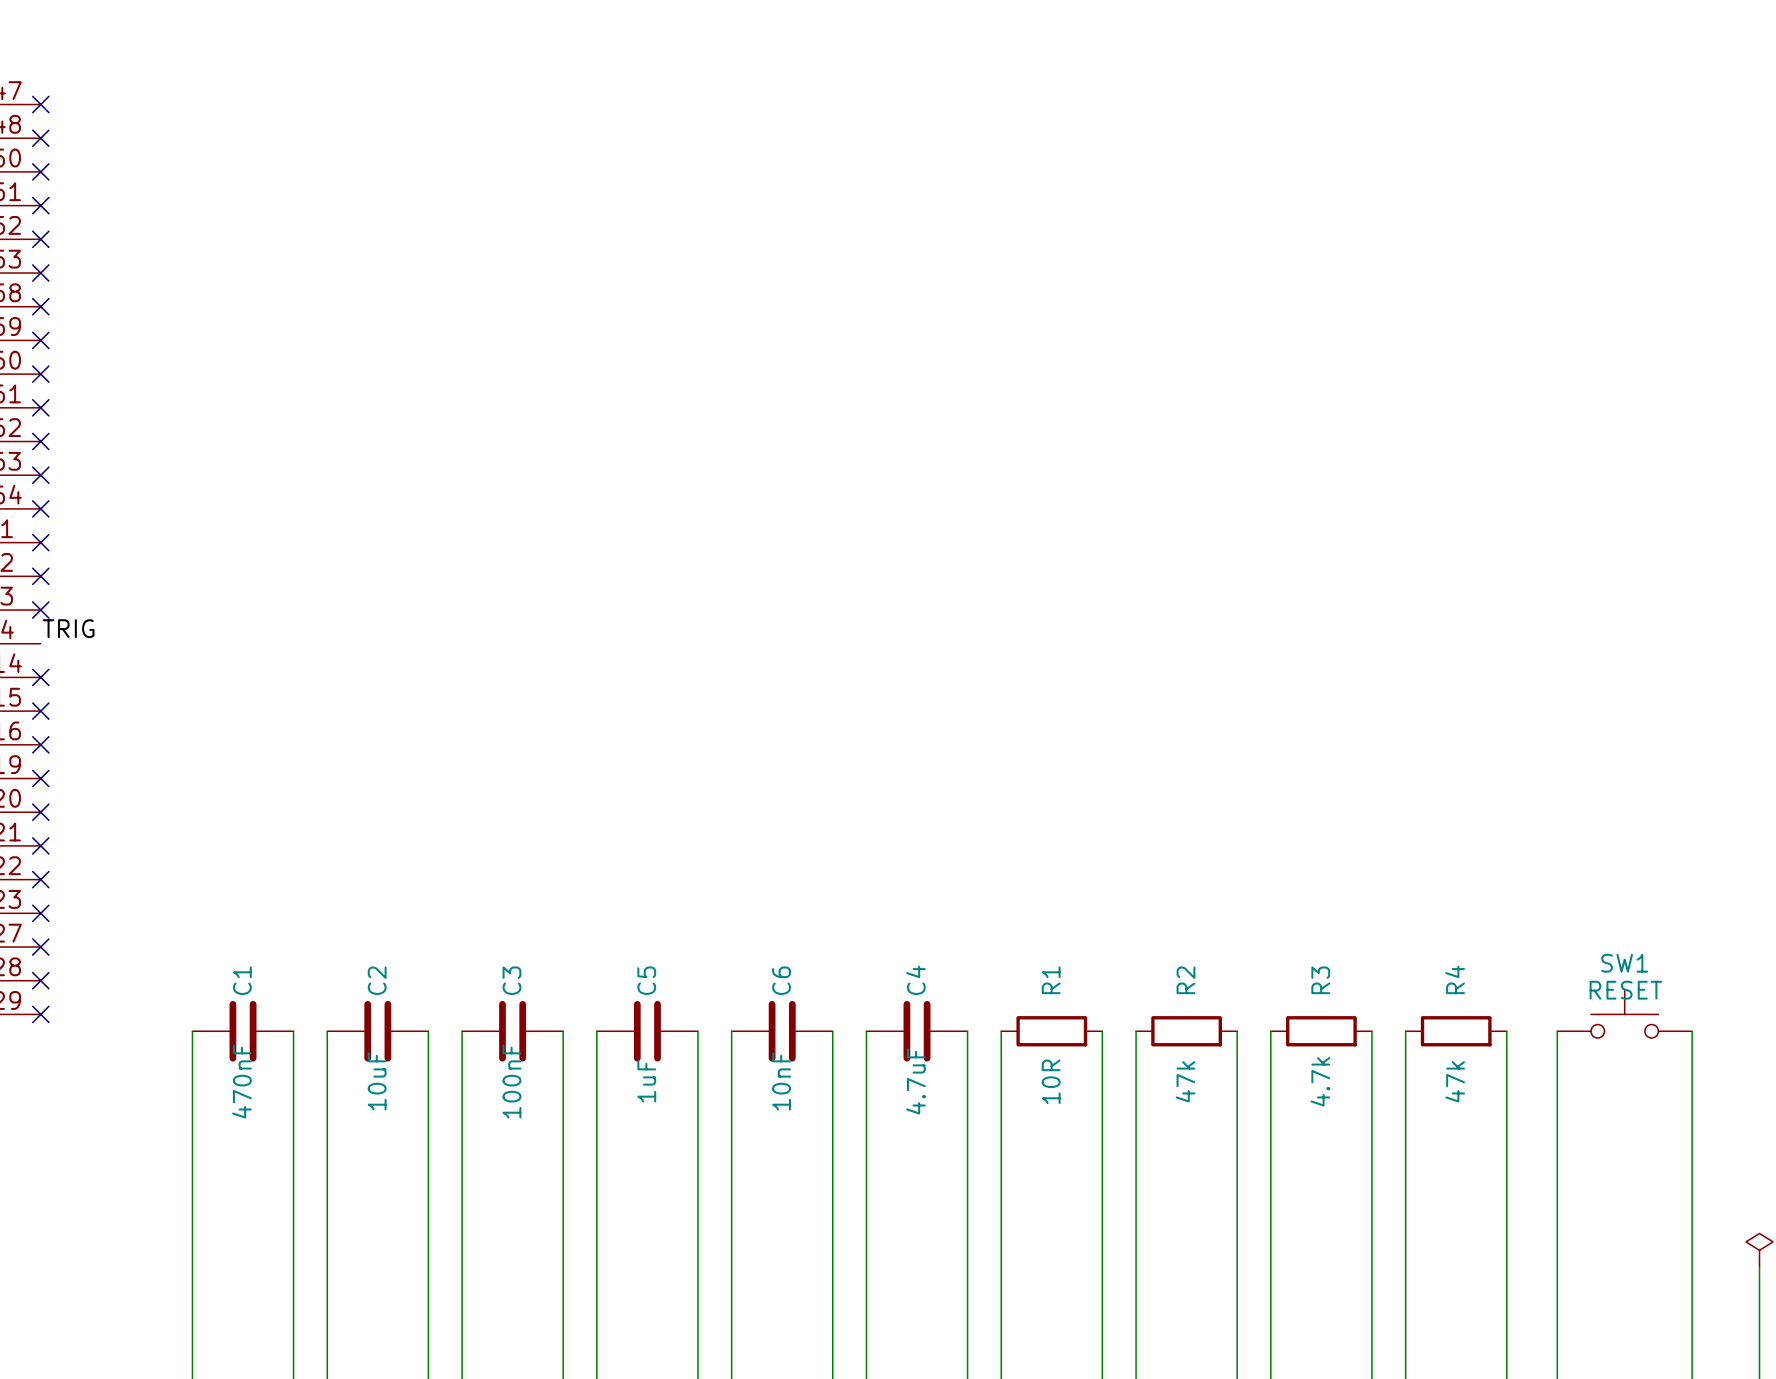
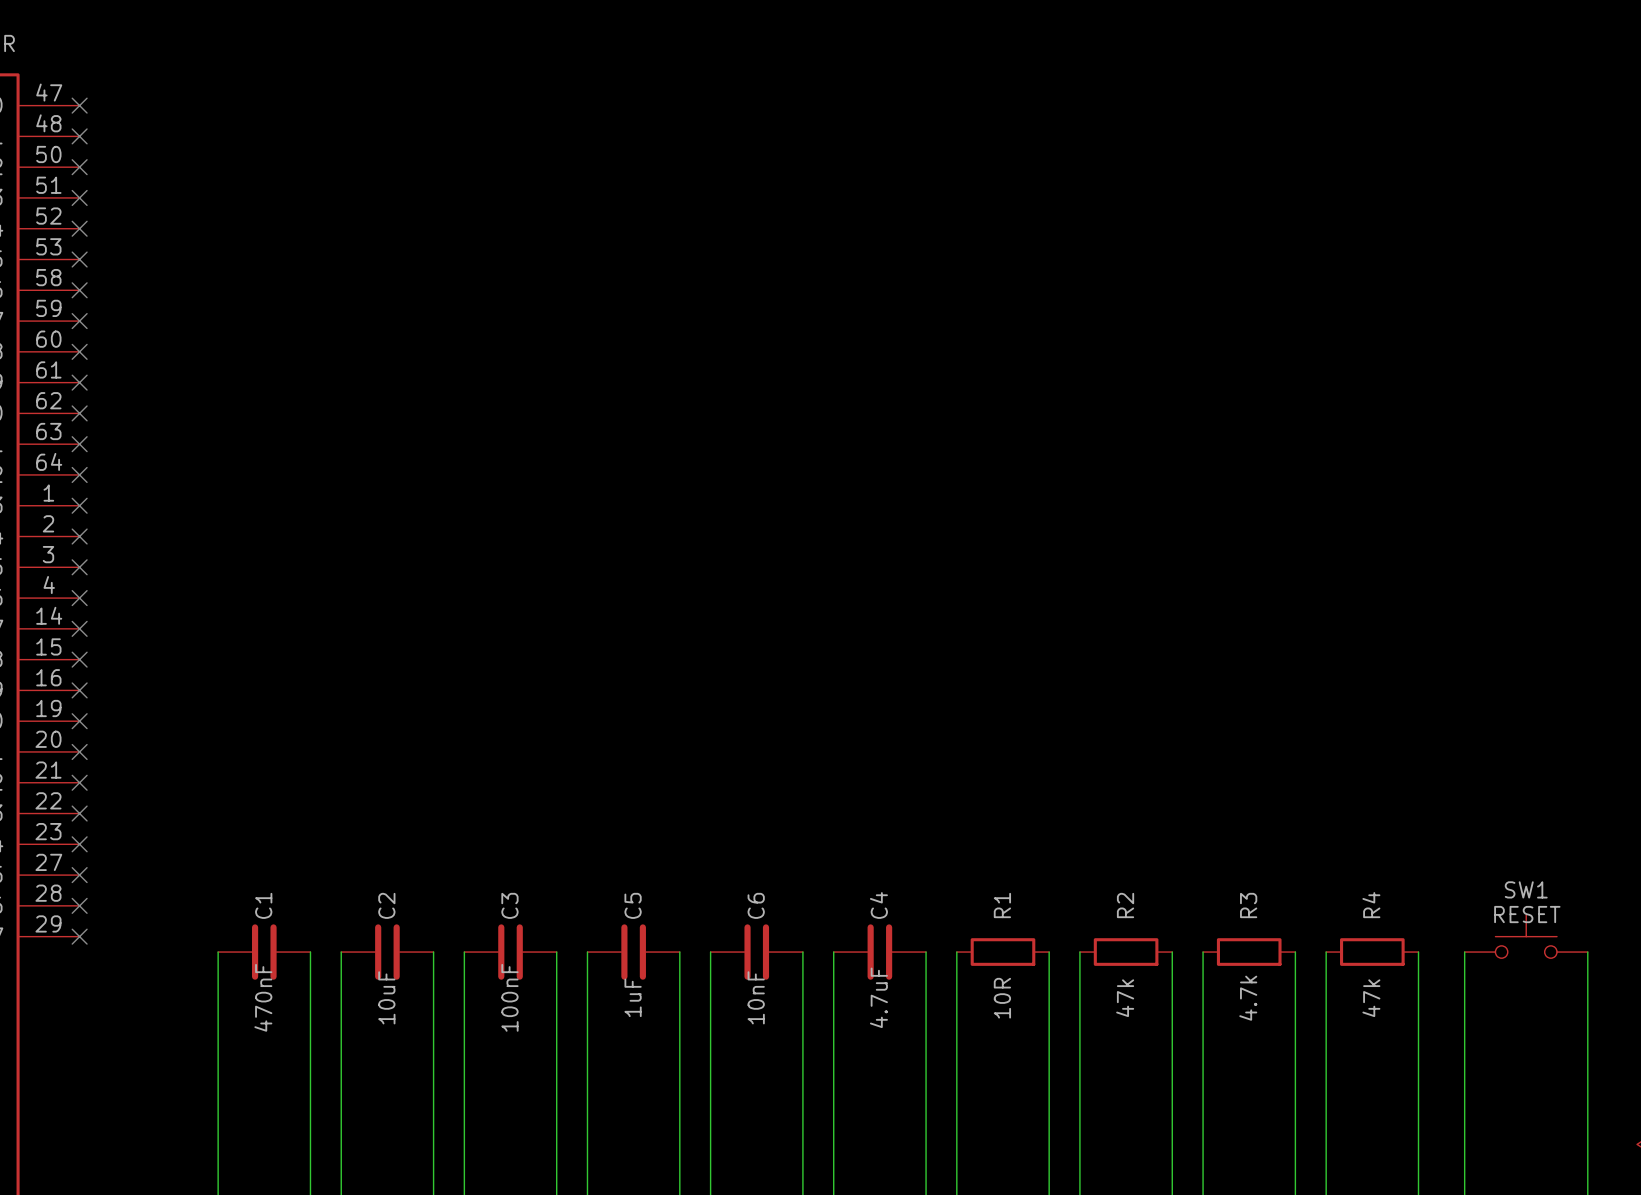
label: TRIG (68, 628) -> none
no-connect mark: none -> (79, 598)

